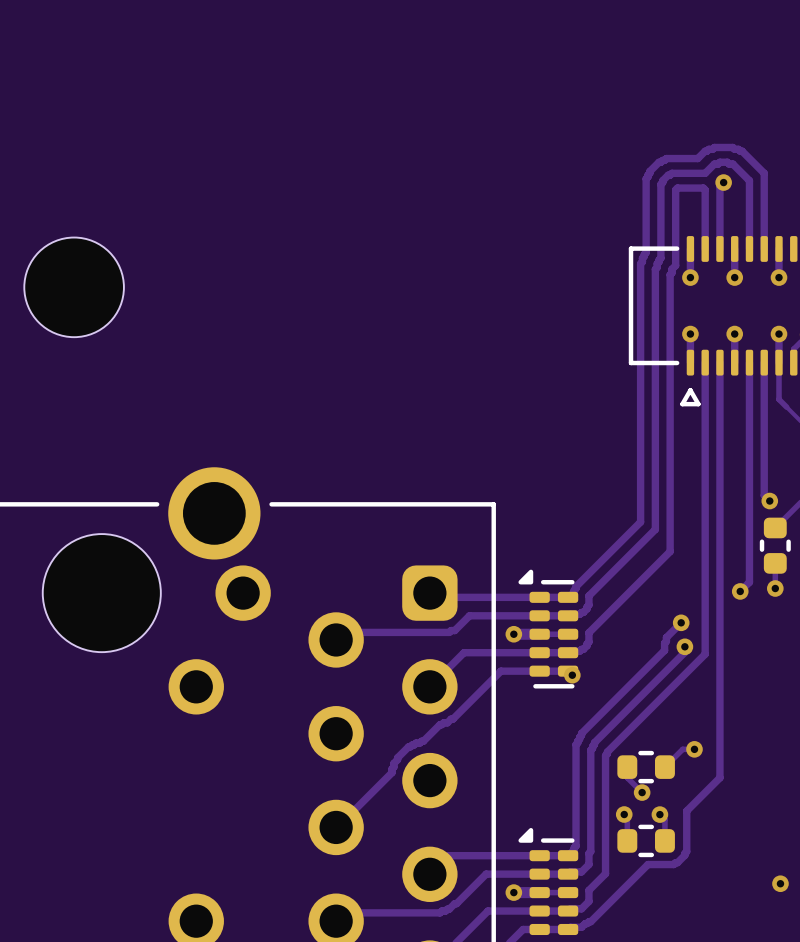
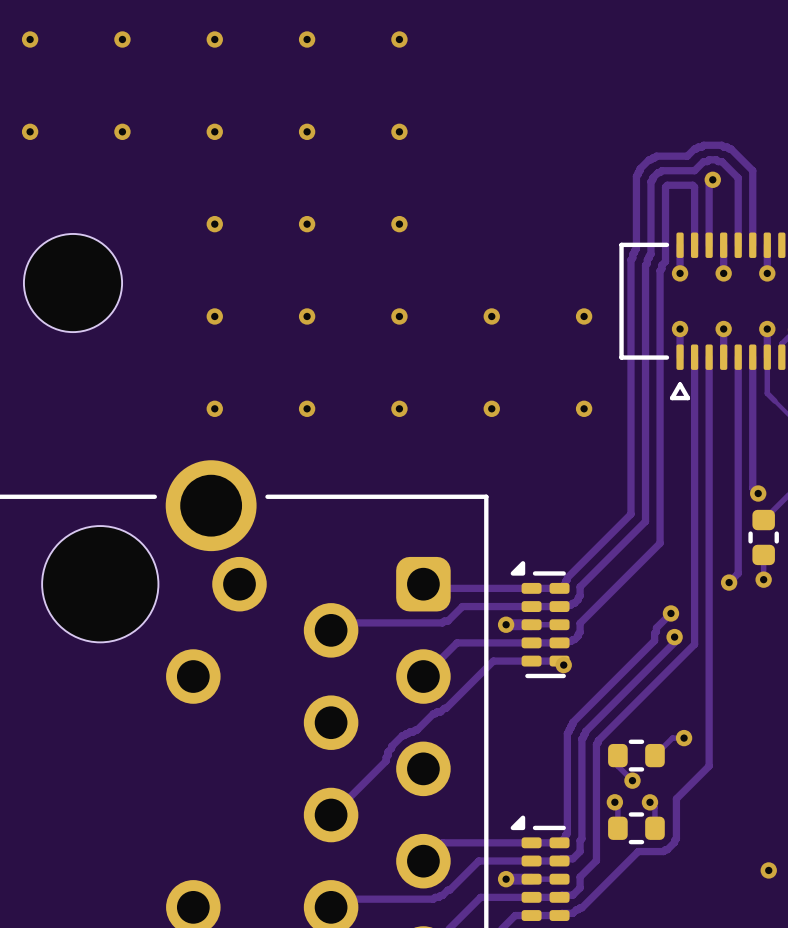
via: none -> (30, 39)
via: none -> (122, 39)
via: none -> (214, 39)
via: none -> (307, 39)
via: none -> (399, 39)
via: none -> (30, 131)
via: none -> (122, 131)
via: none -> (214, 131)
via: none -> (307, 131)
via: none -> (399, 131)
via: none -> (214, 224)
via: none -> (307, 224)
via: none -> (399, 224)
via: none -> (214, 316)
via: none -> (307, 316)
via: none -> (399, 316)
via: none -> (491, 316)
via: none -> (584, 316)
via: none -> (214, 408)
via: none -> (307, 408)
via: none -> (399, 408)
via: none -> (491, 408)
via: none -> (584, 408)

